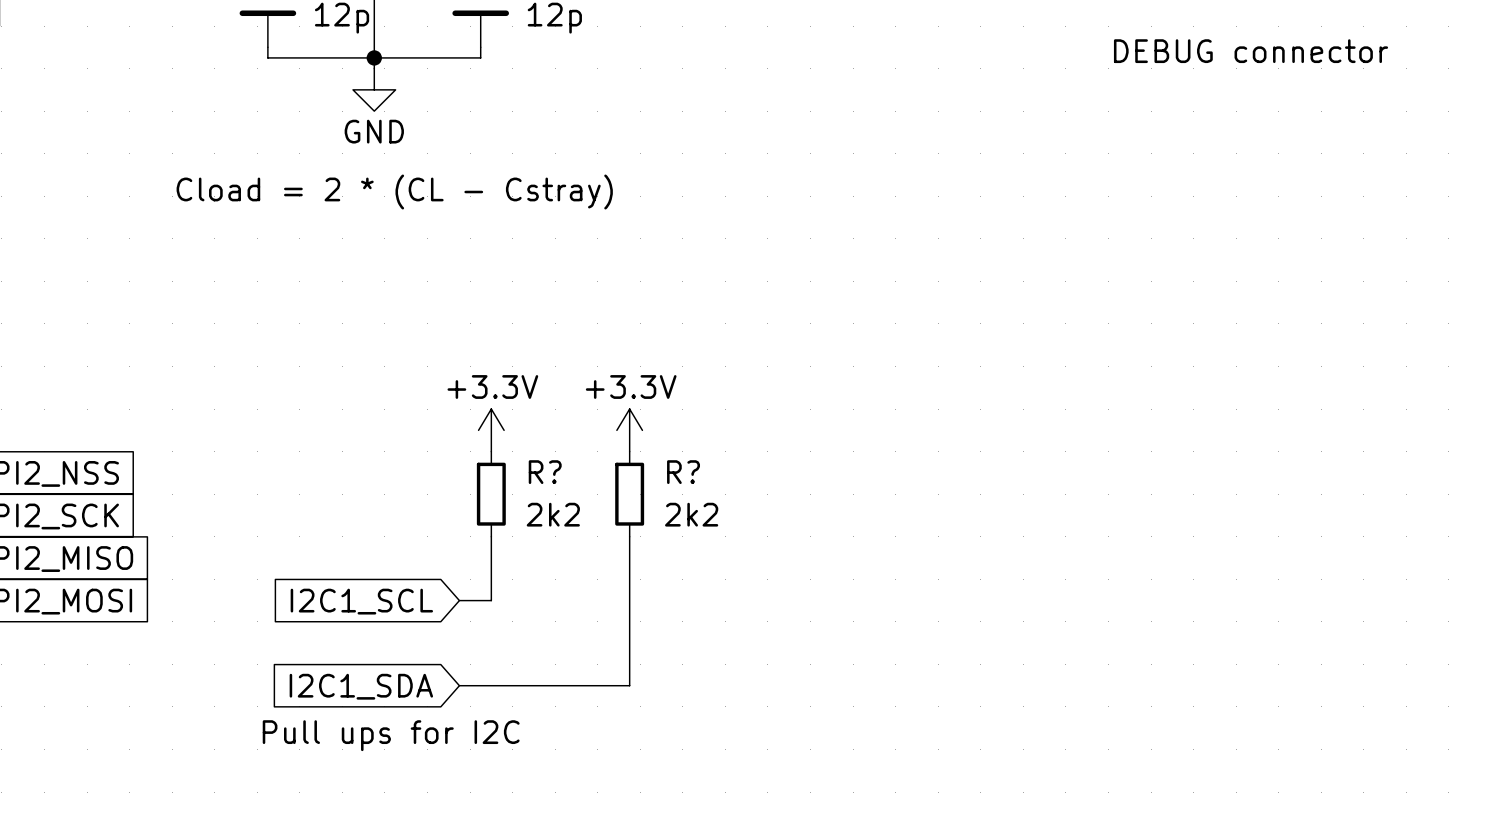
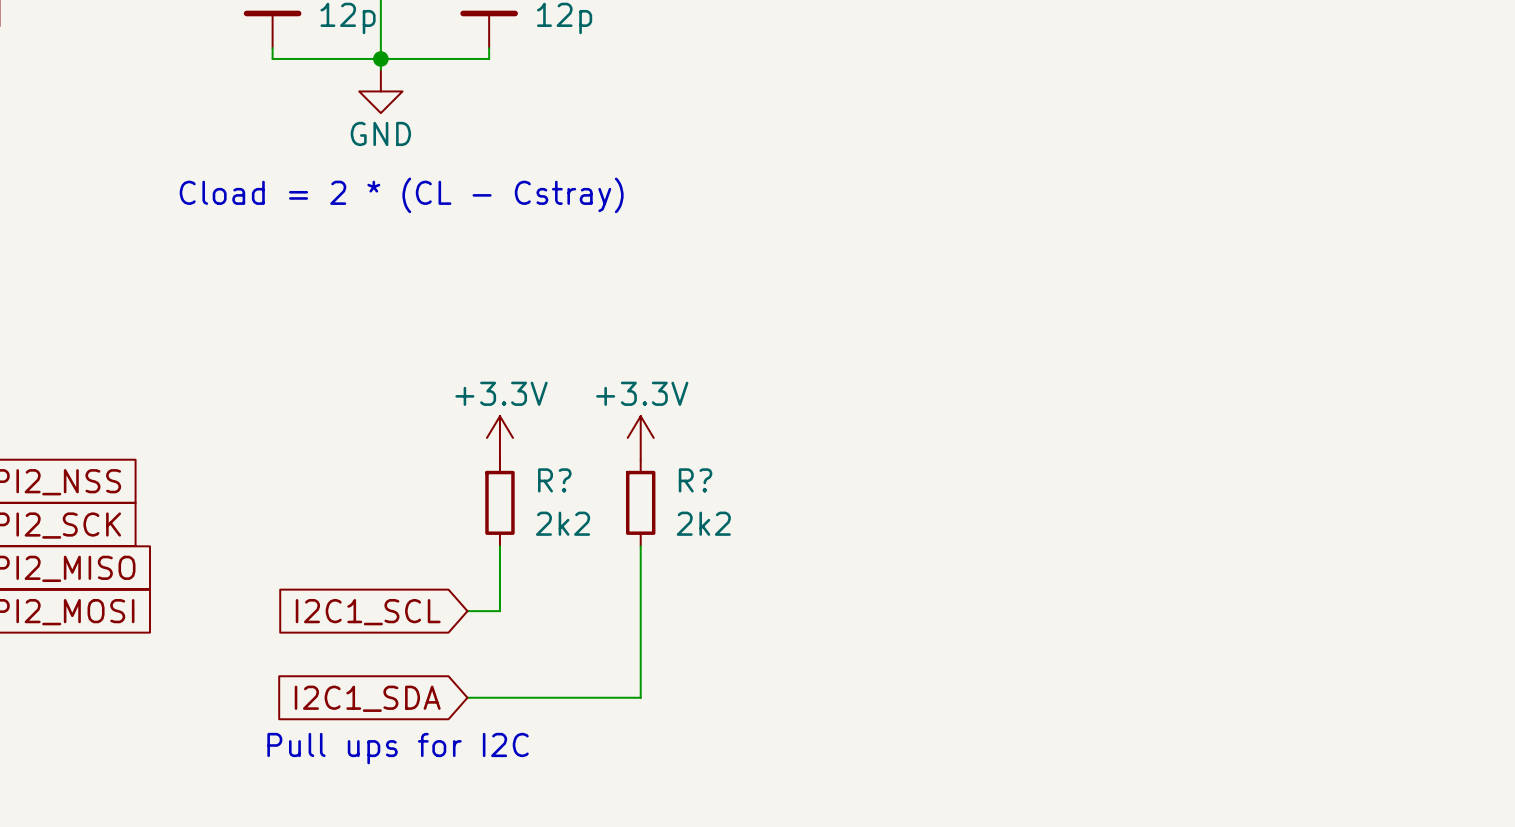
text: DEBUG connector (1251, 51) -> none

